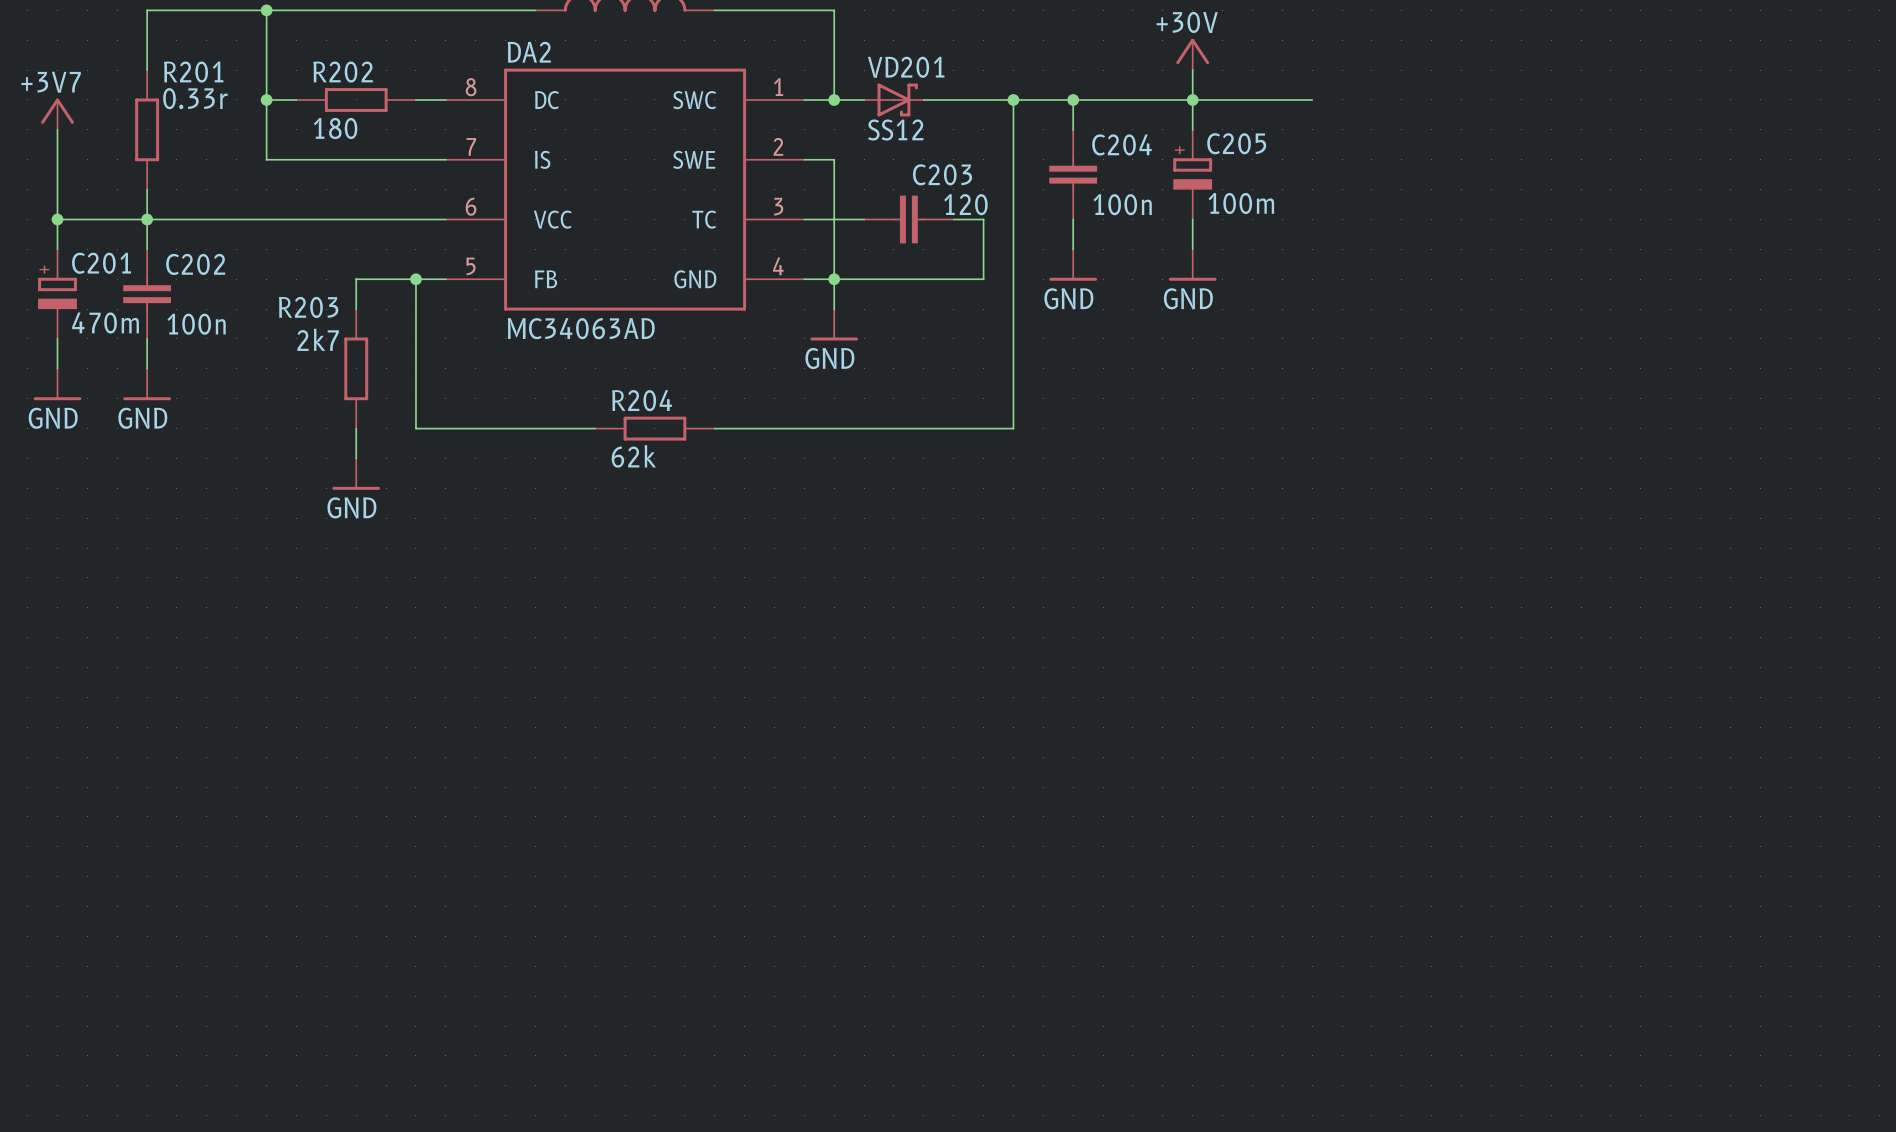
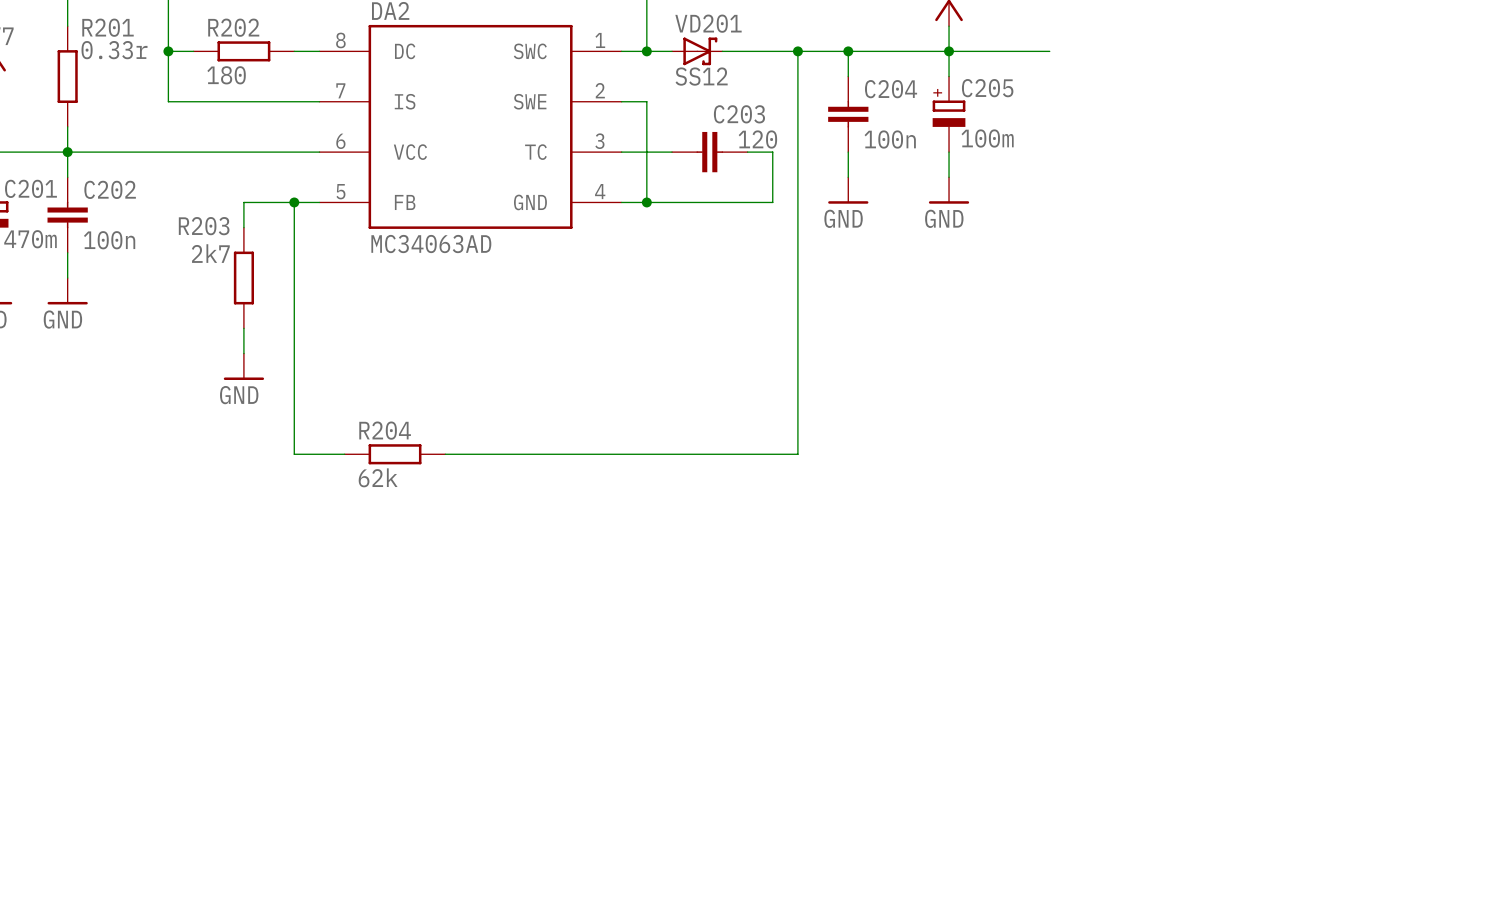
wire: (834, 279) (834, 309) -> none
power symbol: GND (834, 324) -> none
wire: (415, 428) (595, 428) -> (294, 328) (294, 454) (344, 454)
R204 position: (654, 428) -> (395, 454)
wire: (714, 428) (1013, 428) -> (445, 454) (797, 454) (797, 328)

